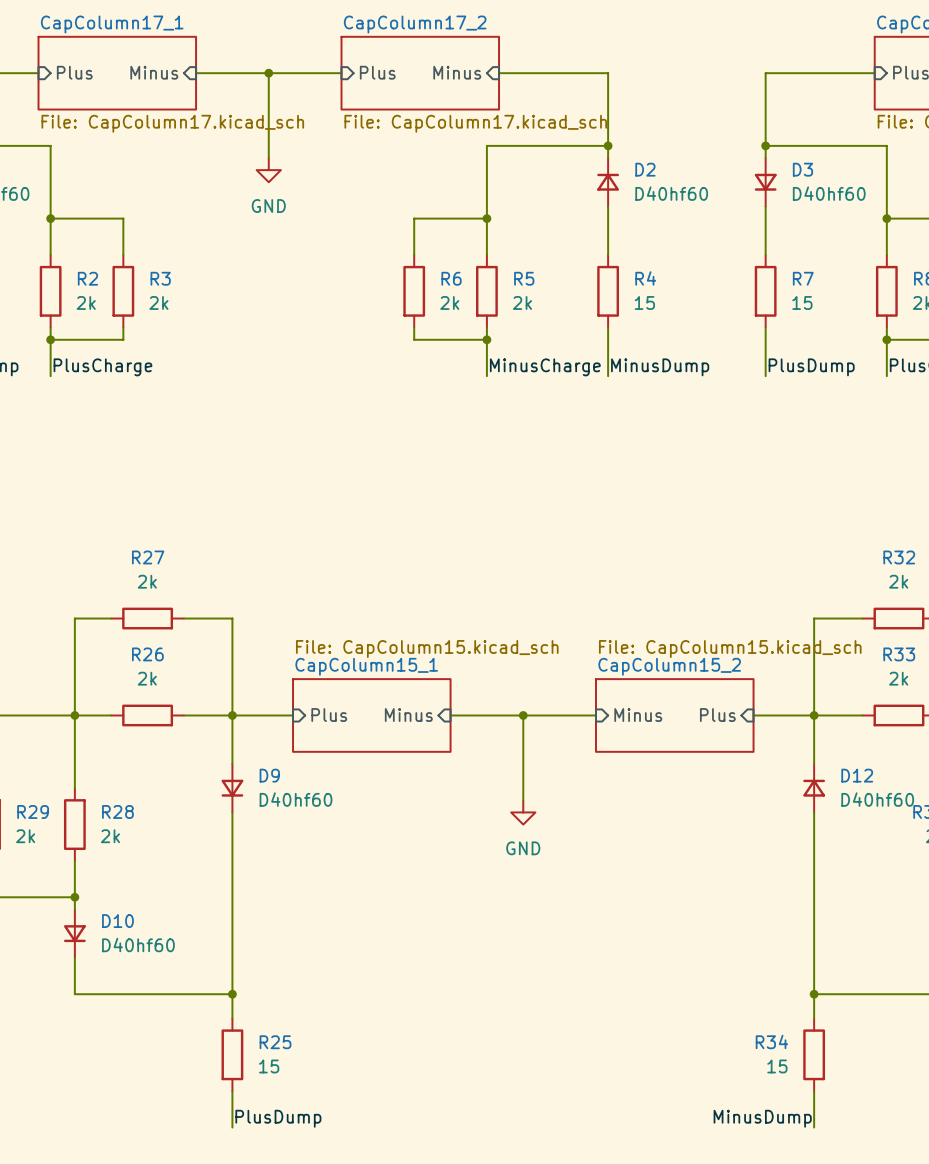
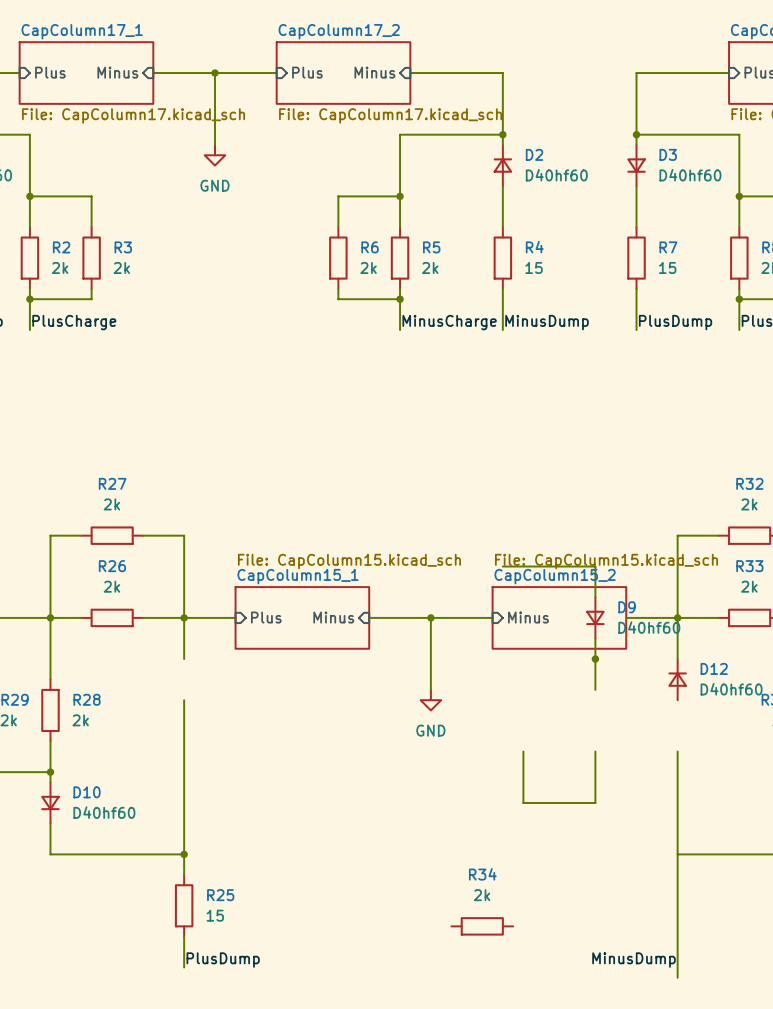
wire: none -> (502, 566) (595, 566) (595, 597)
sheet pin: Plus (717, 715) -> none
junction: none -> (595, 659)
D9 position: (232, 788) -> (595, 617)
wire: (814, 812) (814, 873) -> (595, 638) (595, 689)
wire: none -> (523, 751) (523, 802) (595, 802) (595, 751)
junction: (814, 994) -> none
wire: none -> (677, 874) (677, 936)
R34 name position: R34 (771, 1041) -> R34 (482, 874)
R34 rotation: 0° (814, 1054) -> 90° clockwise (482, 926)
R34 position: (814, 1054) -> (482, 926)
R34 value: 15 (777, 1066) -> 2k (482, 895)
wire: none -> (677, 967) (677, 977)

